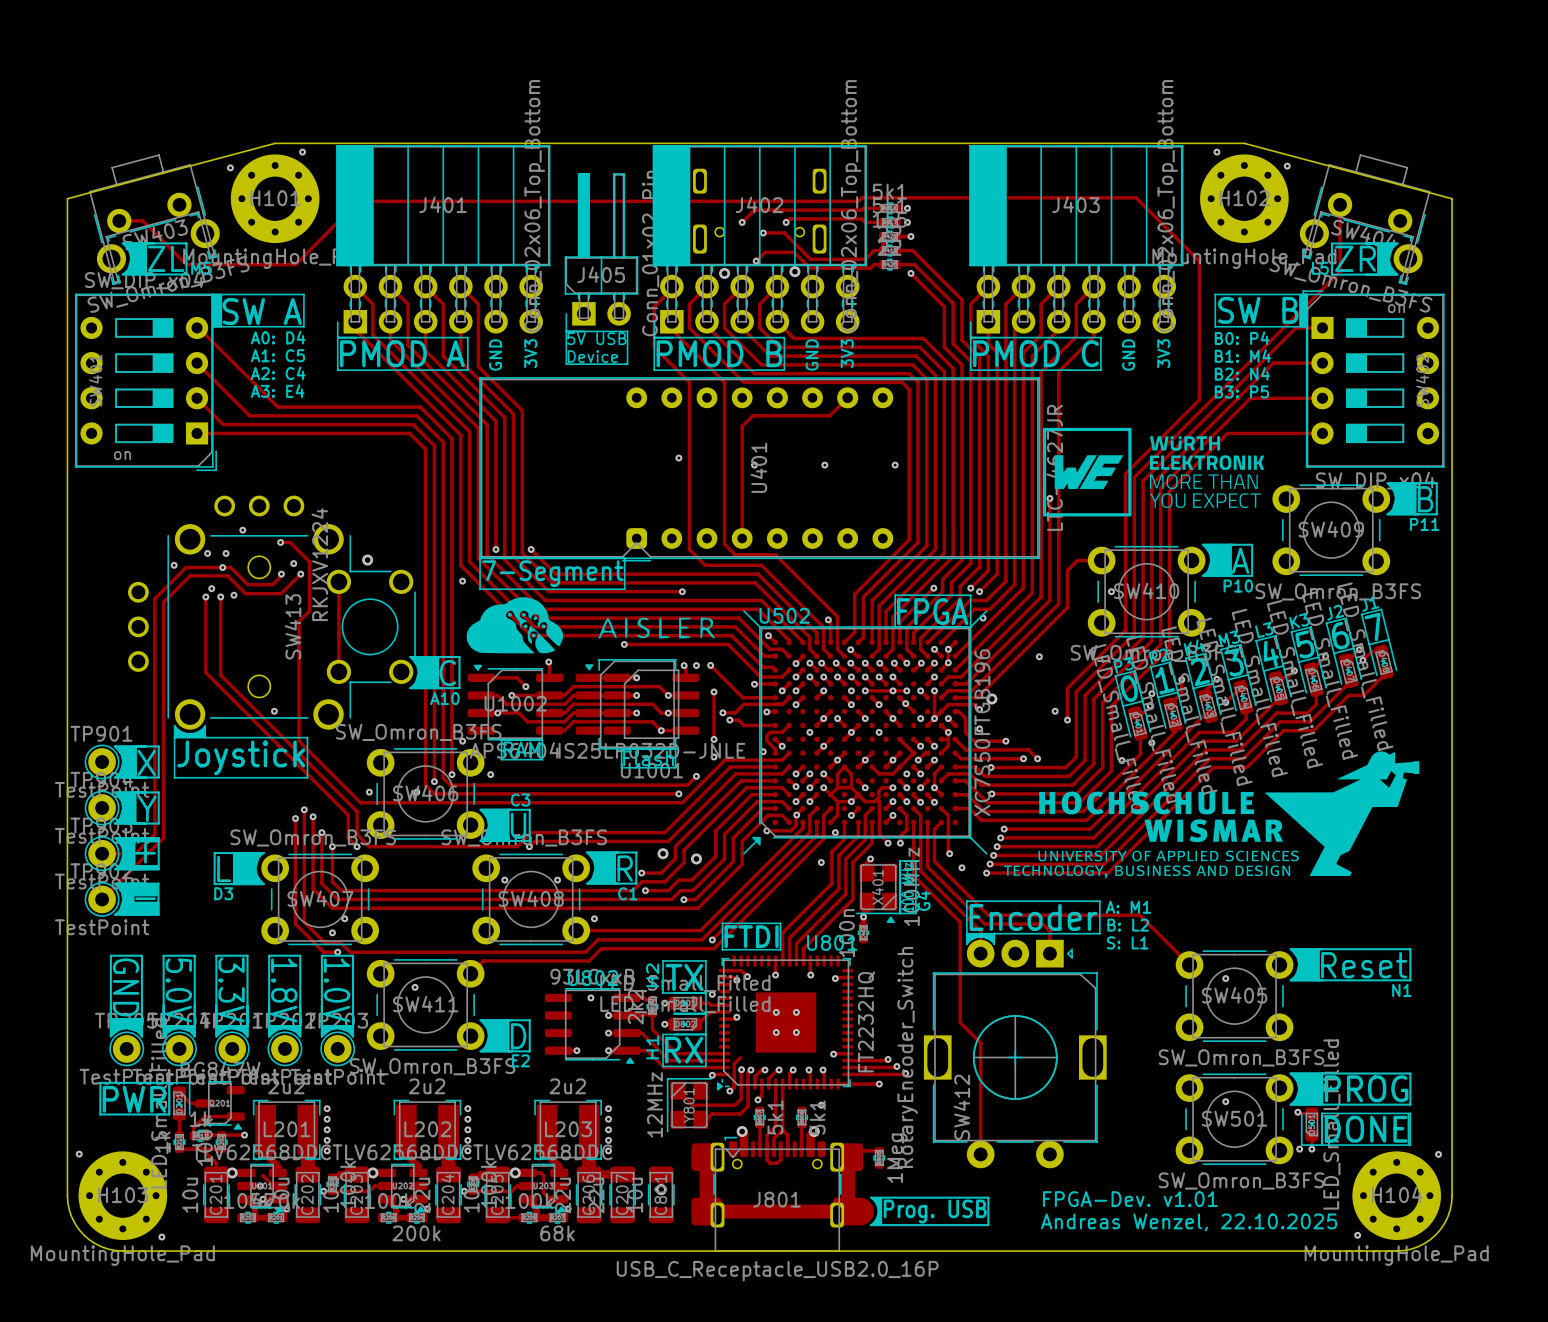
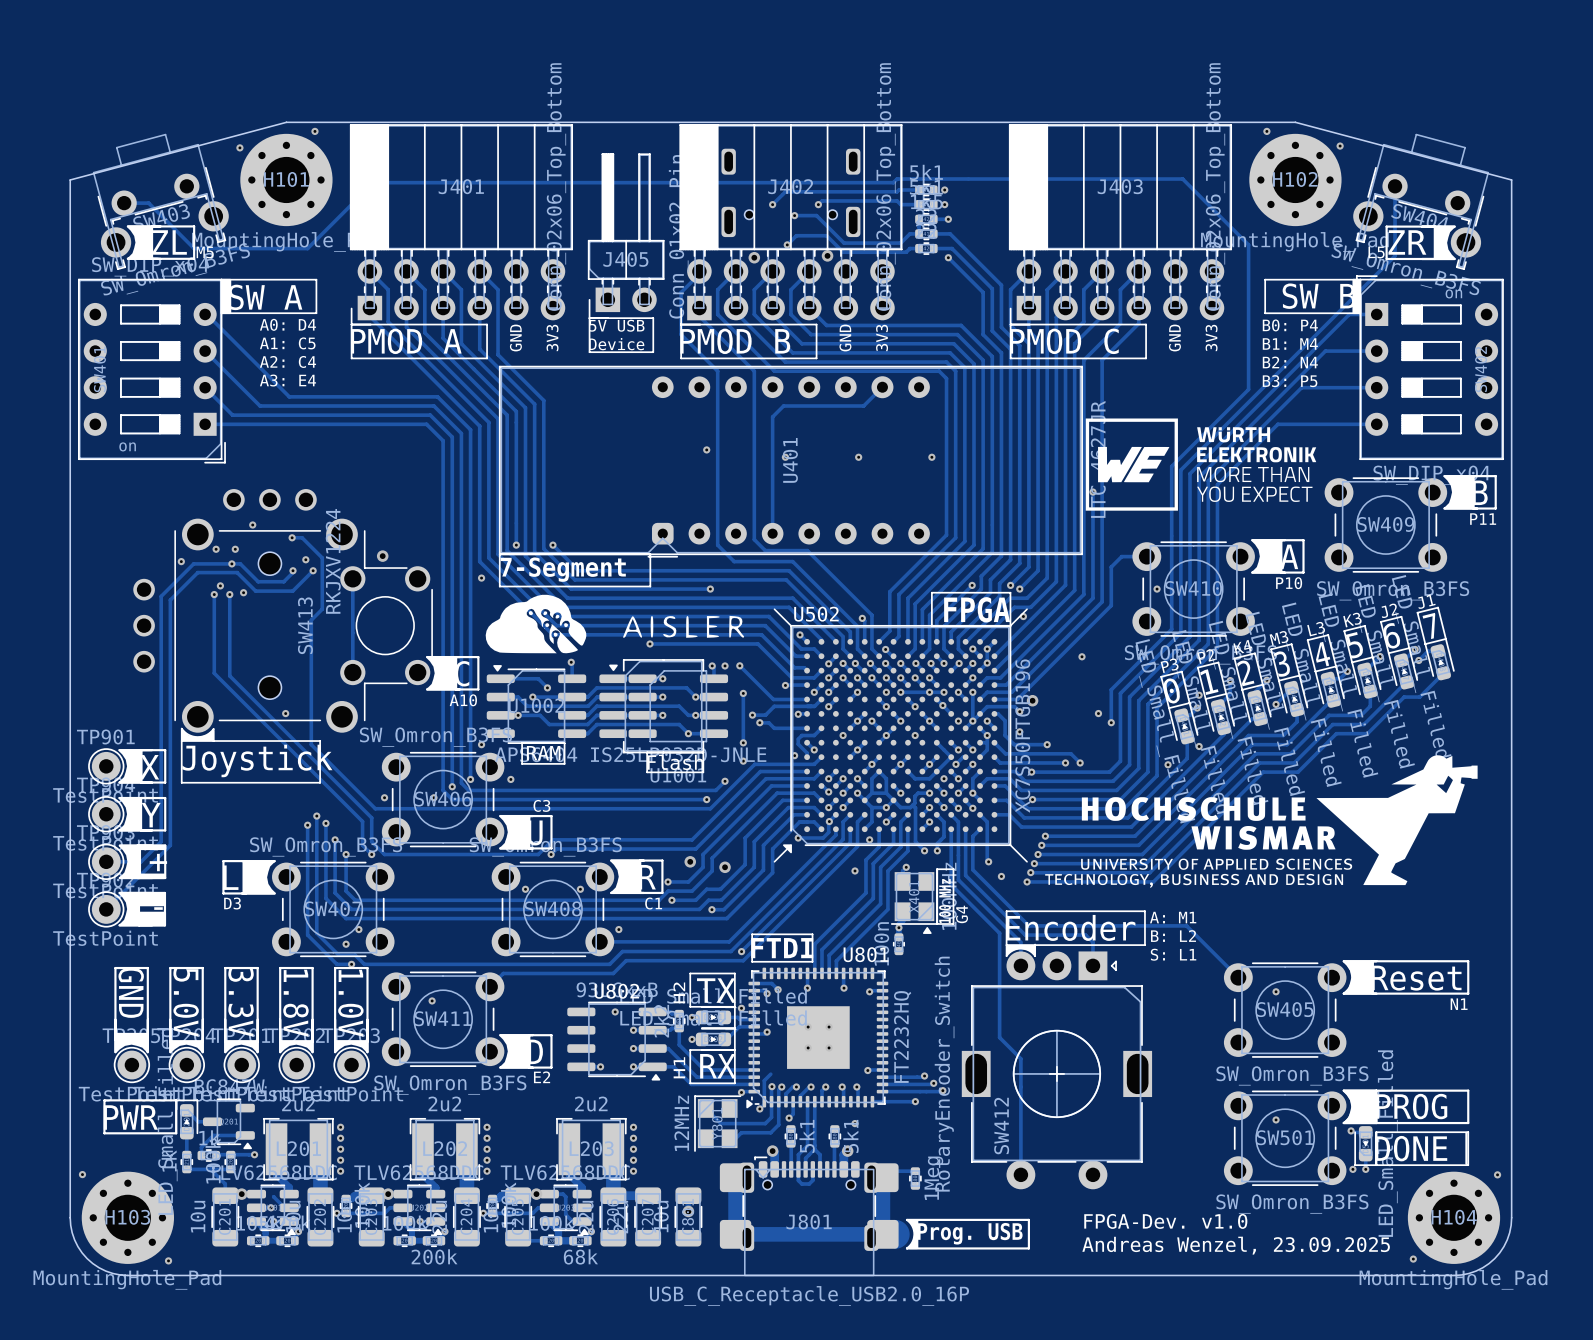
text: FPGA-Dev. v1.01 (1130, 1199) -> FPGA-Dev. v1.0 (1165, 1221)
text: Andreas Wenzel, 22.10.2025 (1189, 1222) -> Andreas Wenzel, 23.09.2025 (1236, 1245)

